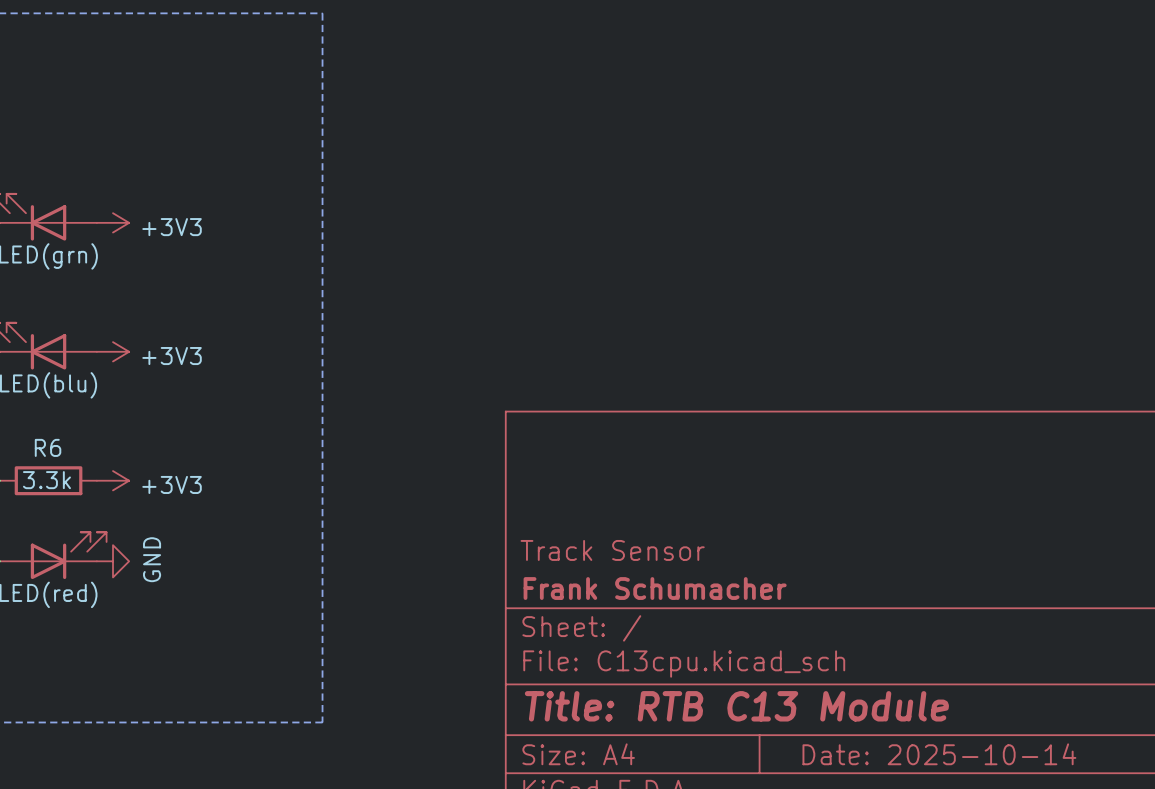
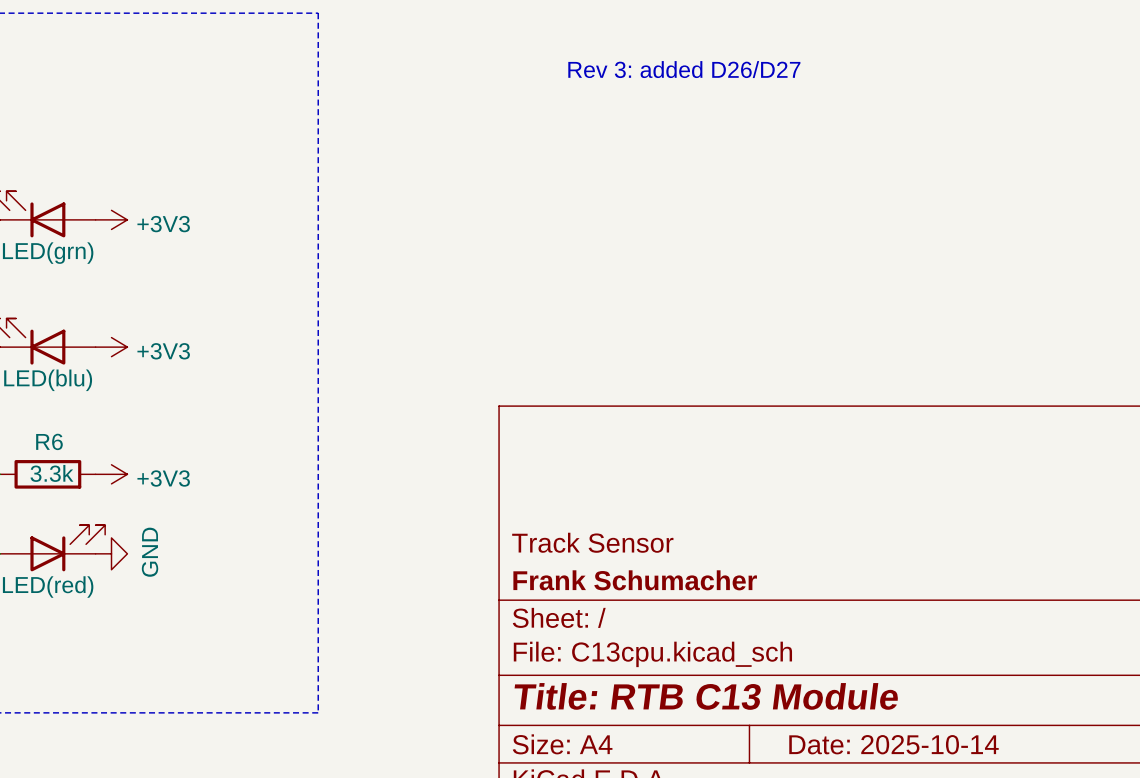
text: none -> Rev 3: added D26/D27 (684, 69)

